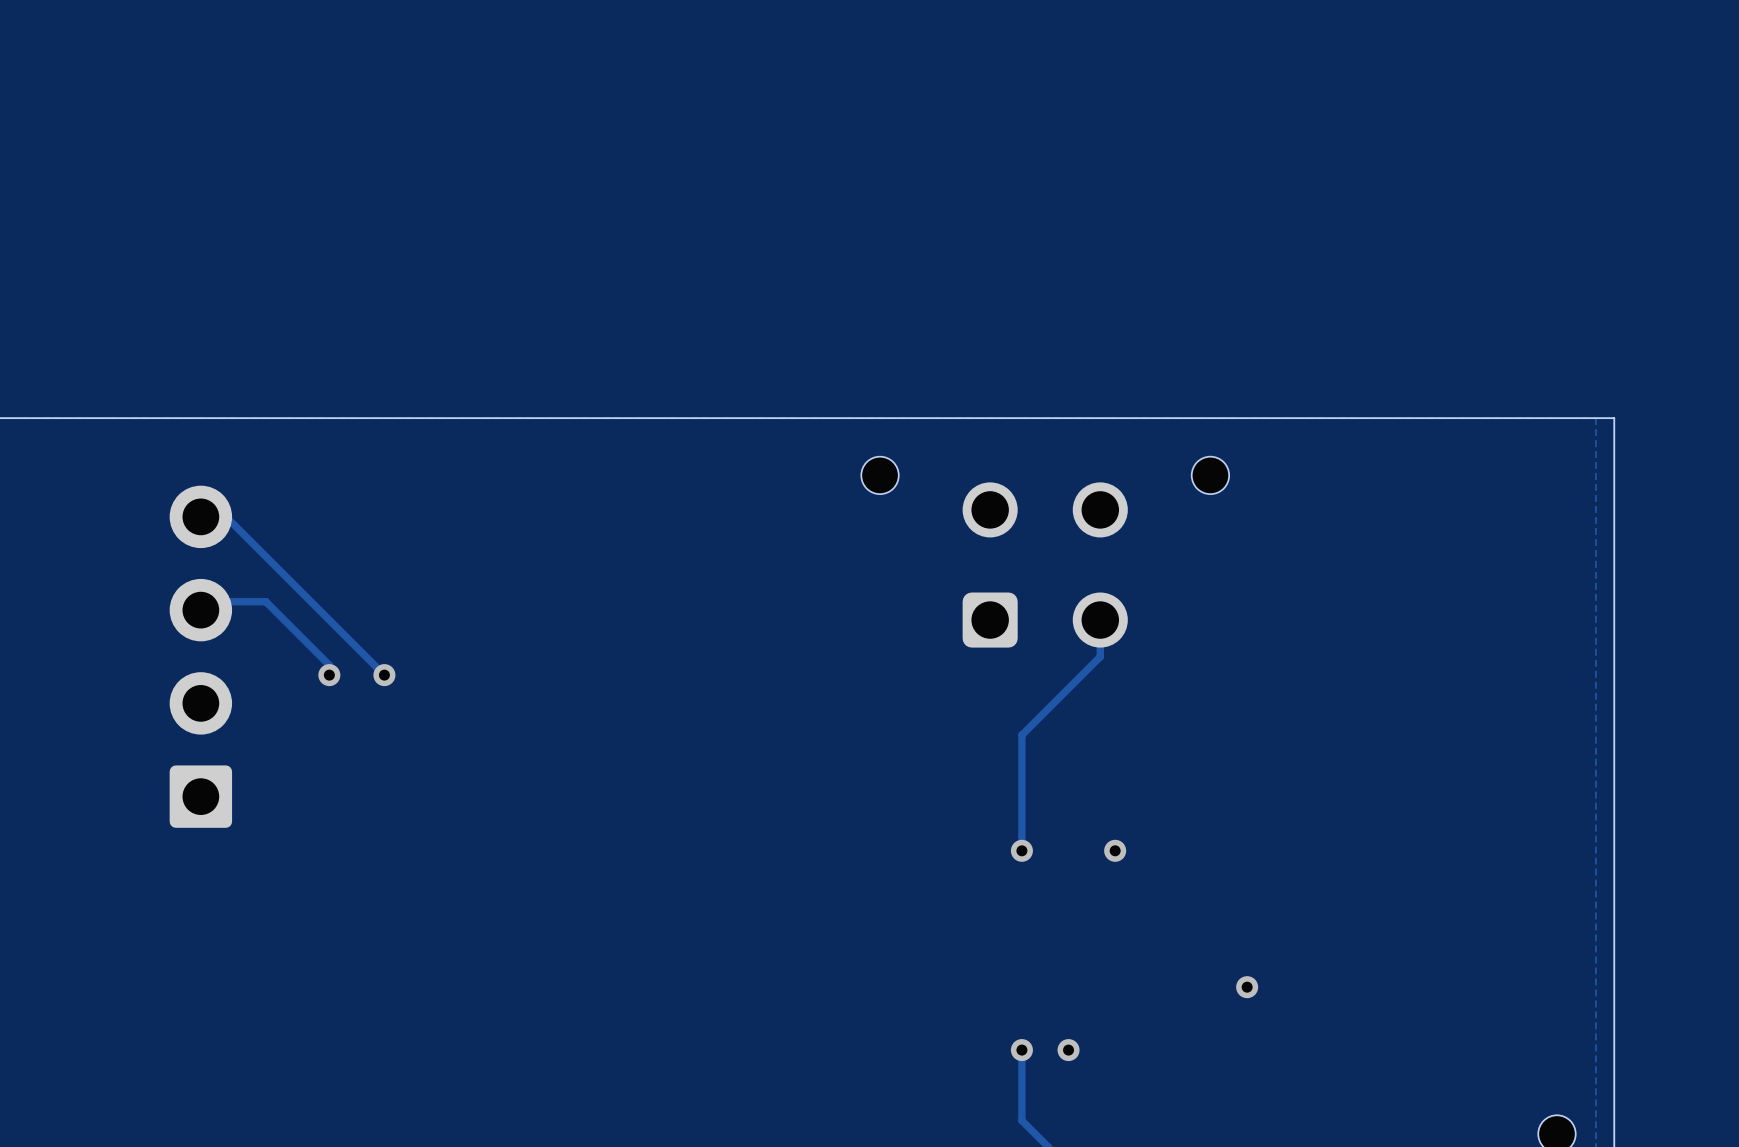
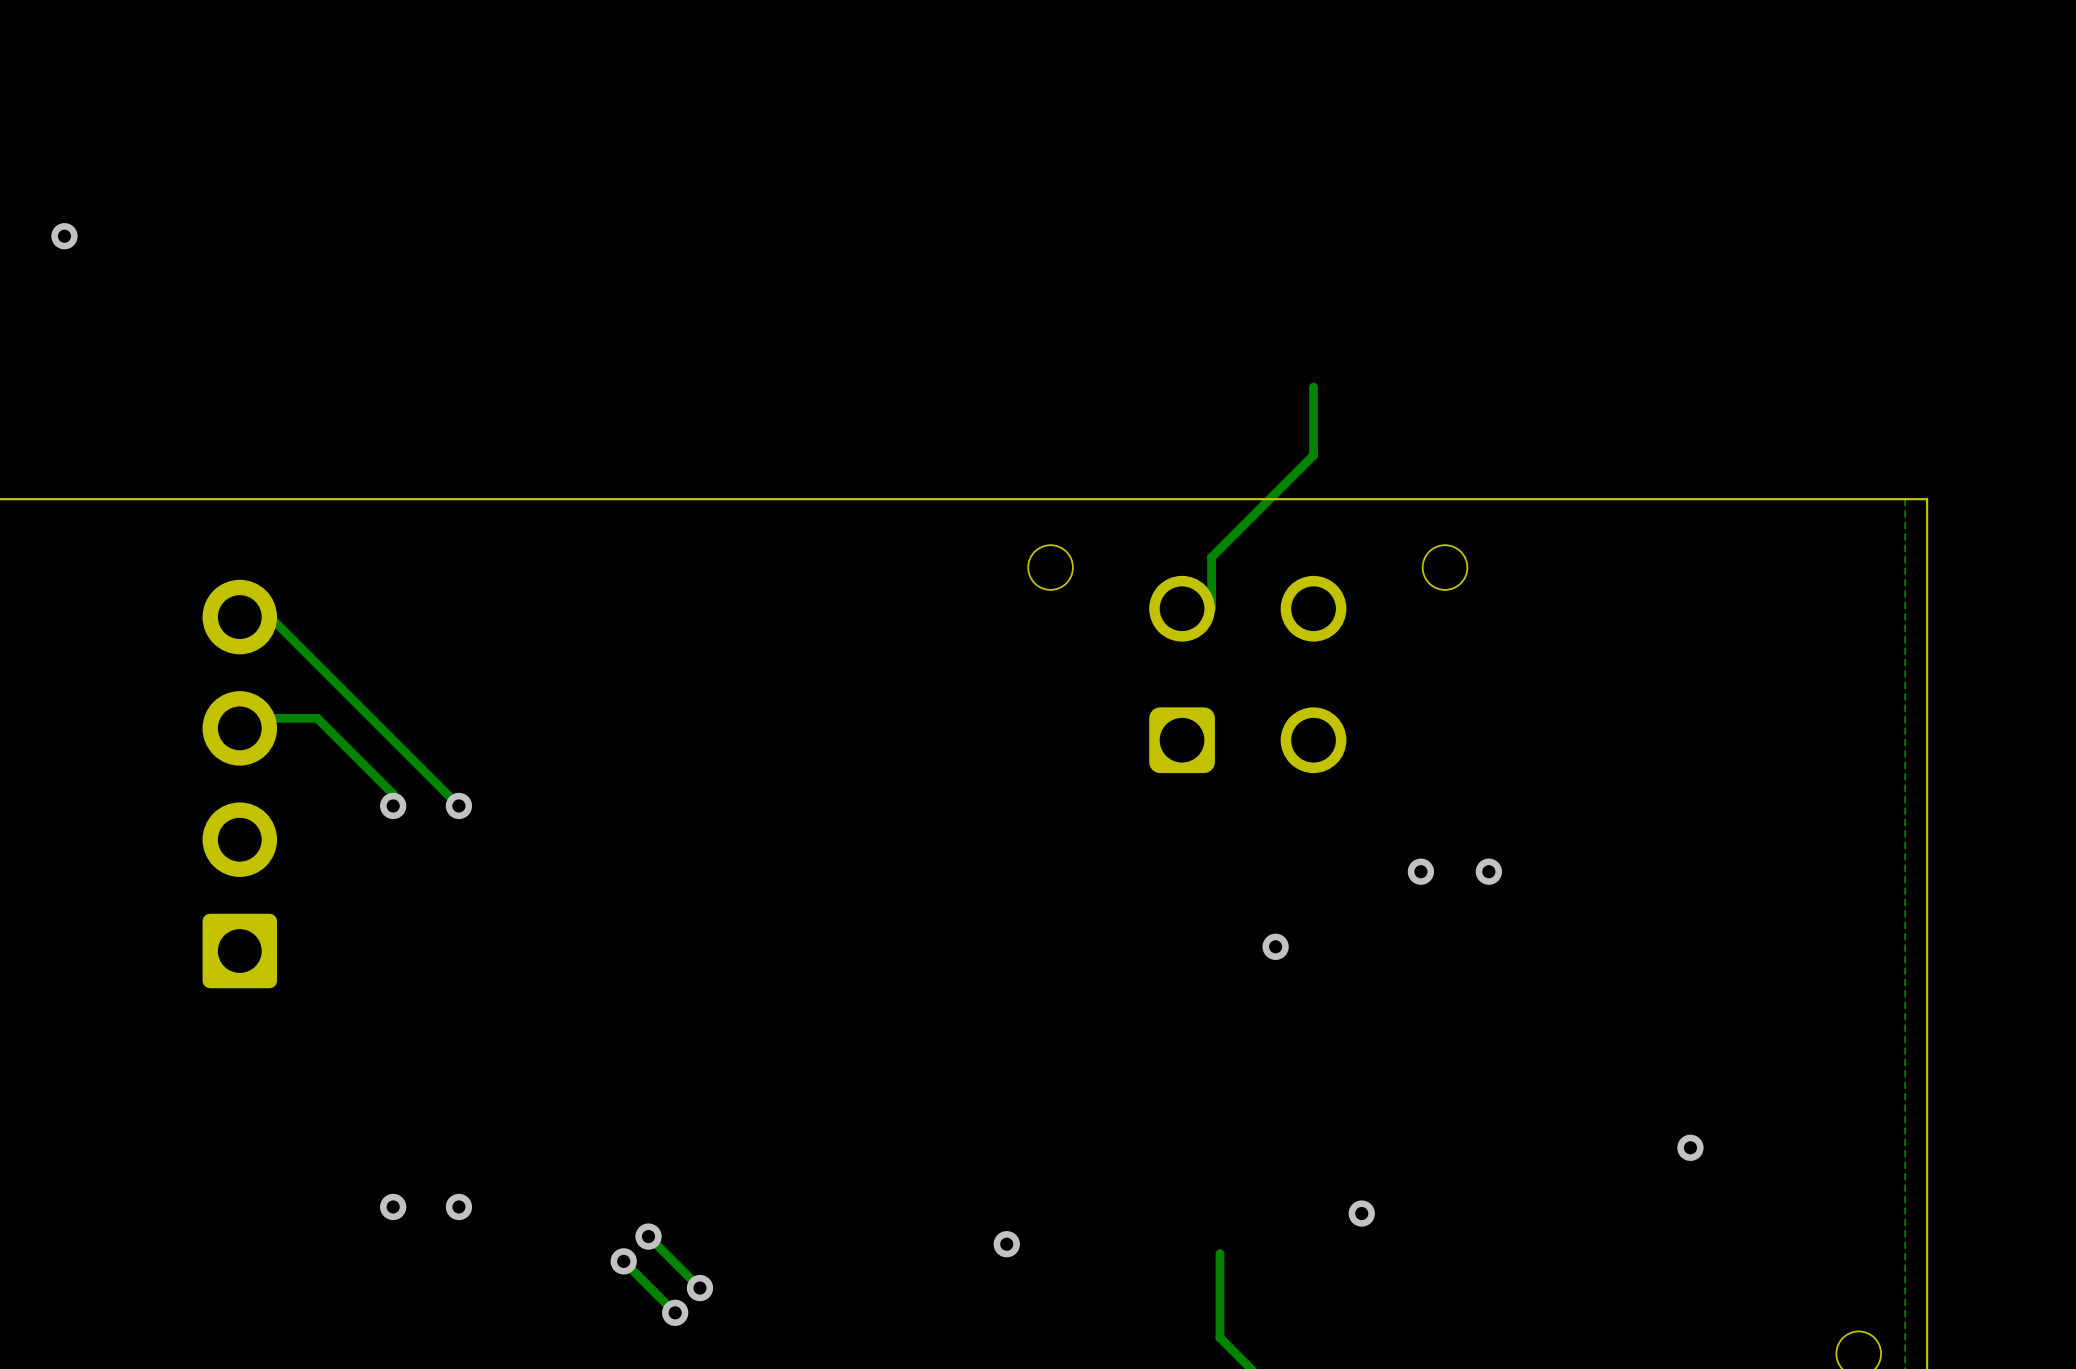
via: none -> (64, 236)
track: none -> (1313, 386) (1313, 455) (1211, 557) (1211, 608)
track: (1100, 620) (1100, 656) (1021, 735) (1021, 850) -> none
via: none -> (1420, 871)
via: none -> (1488, 871)
via: none -> (1275, 946)
via: (1021, 850) -> none
via: (1115, 850) -> none
via: none -> (1690, 1147)
via: (1247, 987) -> none
via: none -> (393, 1206)
via: none -> (458, 1206)
via: none -> (1361, 1213)
track: none -> (648, 1236) (699, 1288)
via: none -> (648, 1236)
via: none -> (1006, 1244)
via: (1021, 1050) -> none
via: (1068, 1050) -> none
track: none -> (623, 1261) (675, 1312)
via: none -> (623, 1261)
via: none -> (699, 1288)
via: none -> (675, 1312)

